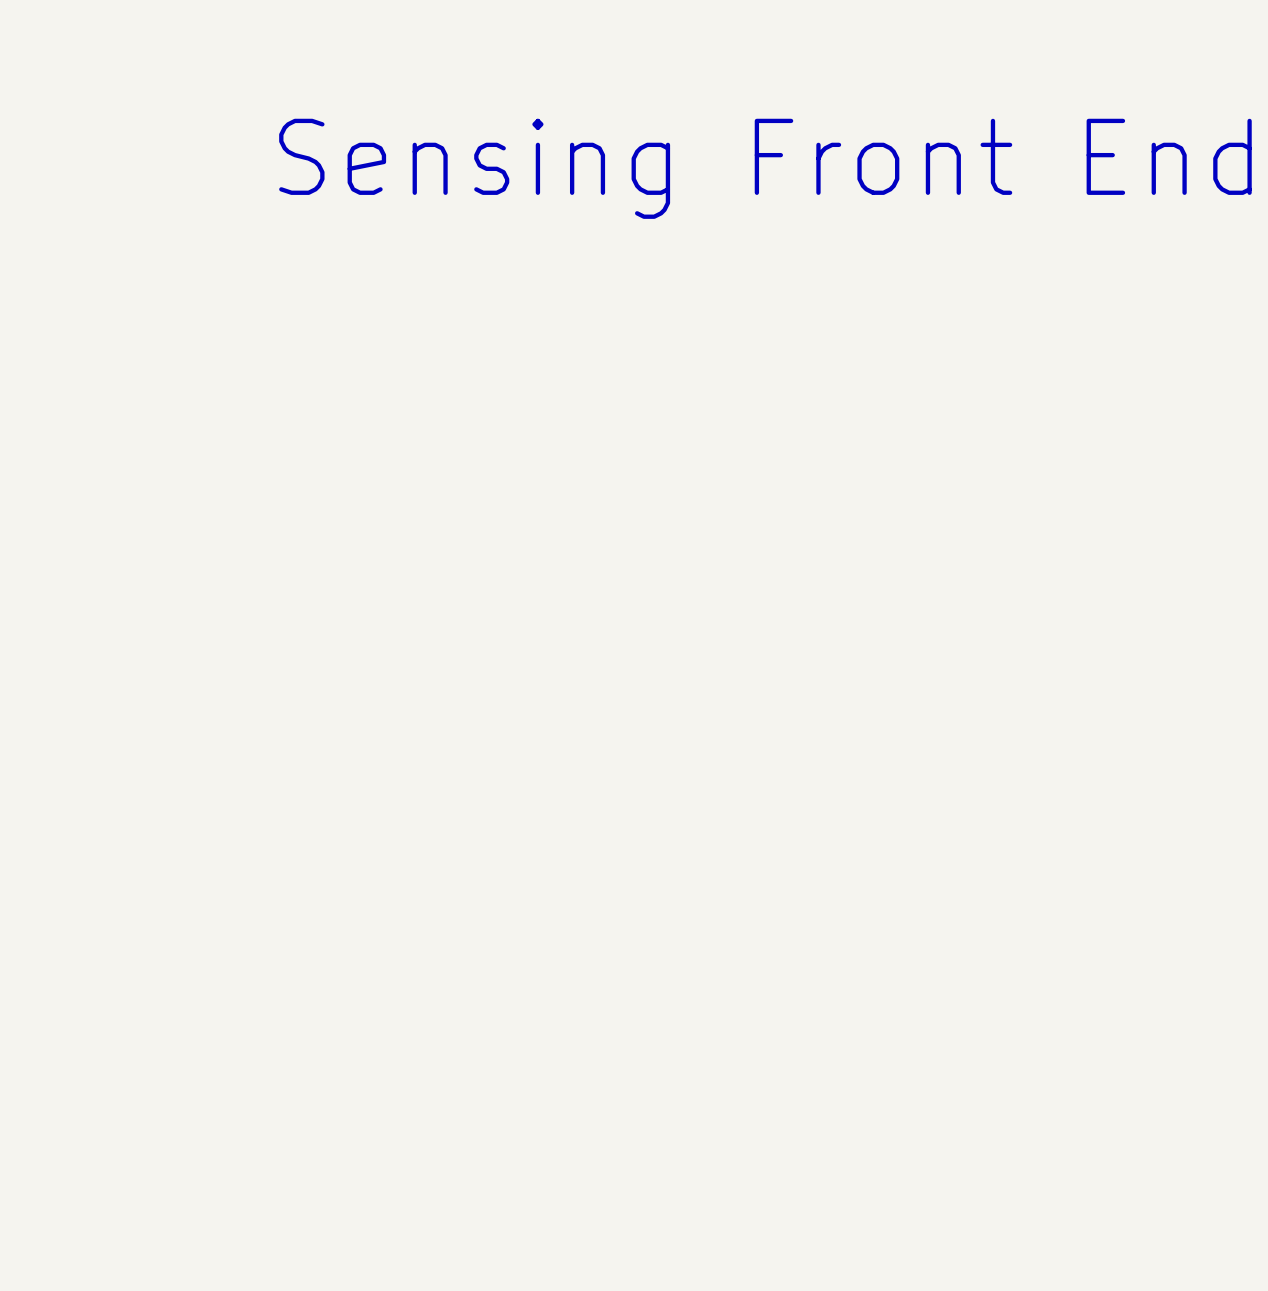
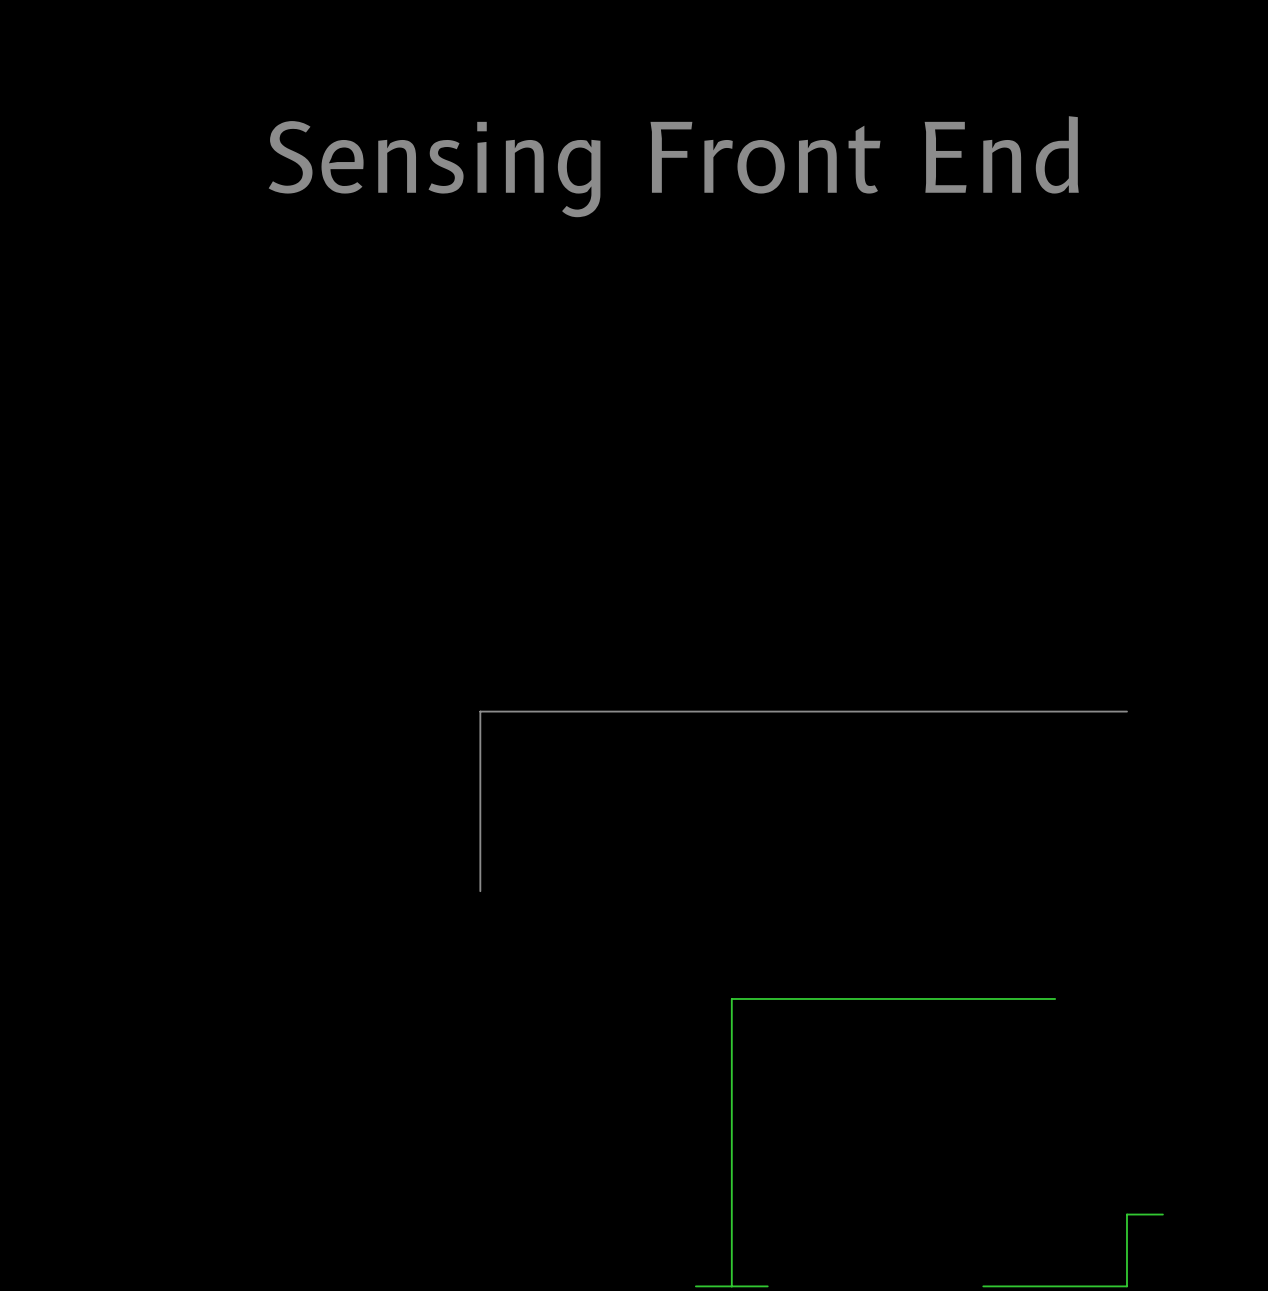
line: none -> (1126, 711) (480, 711) (480, 891)
wire: none -> (1055, 998) (731, 998) (731, 1286)
wire: none -> (1162, 1214) (1126, 1214) (1126, 1286) (983, 1286)
wire: none -> (695, 1286) (767, 1286)

